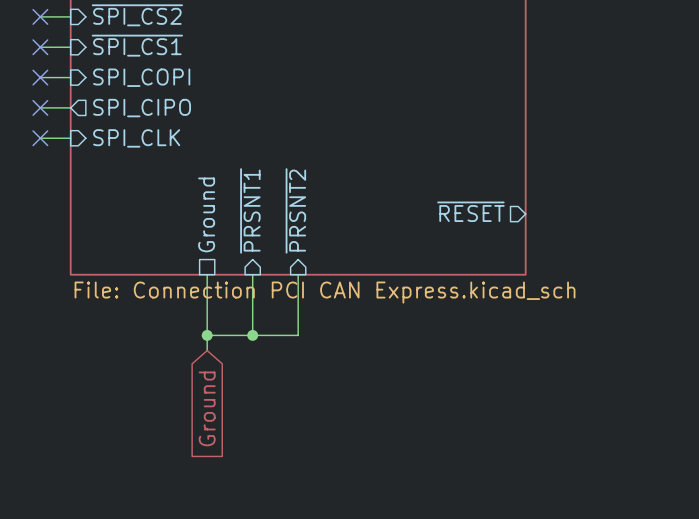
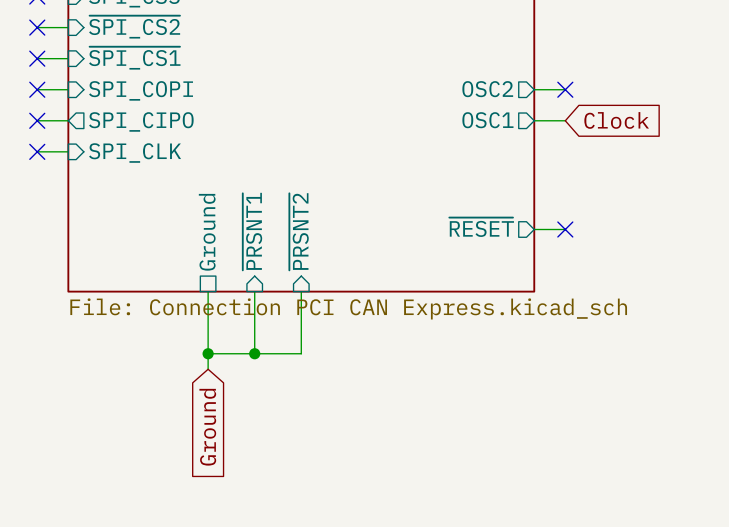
sheet pin: none -> OSC2 (487, 89)
wire: none -> (534, 89) (565, 89)
no-connect mark: none -> (565, 89)
sheet pin: none -> OSC1 (487, 120)
wire: none -> (534, 120) (565, 120)
global label: none -> Clock (616, 120)
wire: none -> (534, 229) (565, 229)
no-connect mark: none -> (565, 229)

